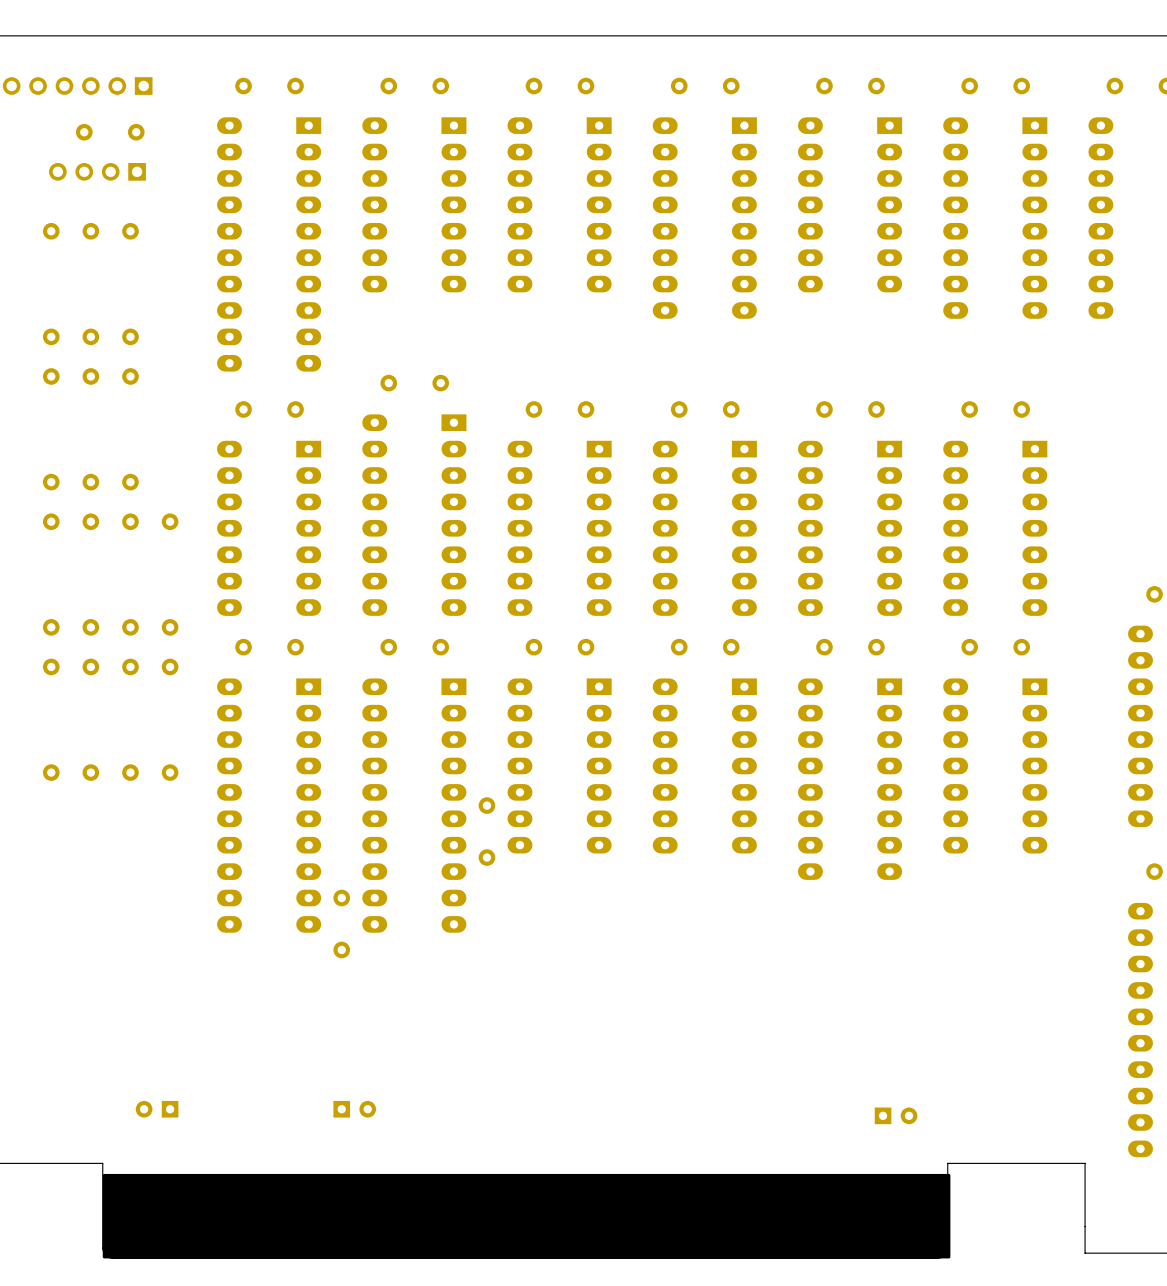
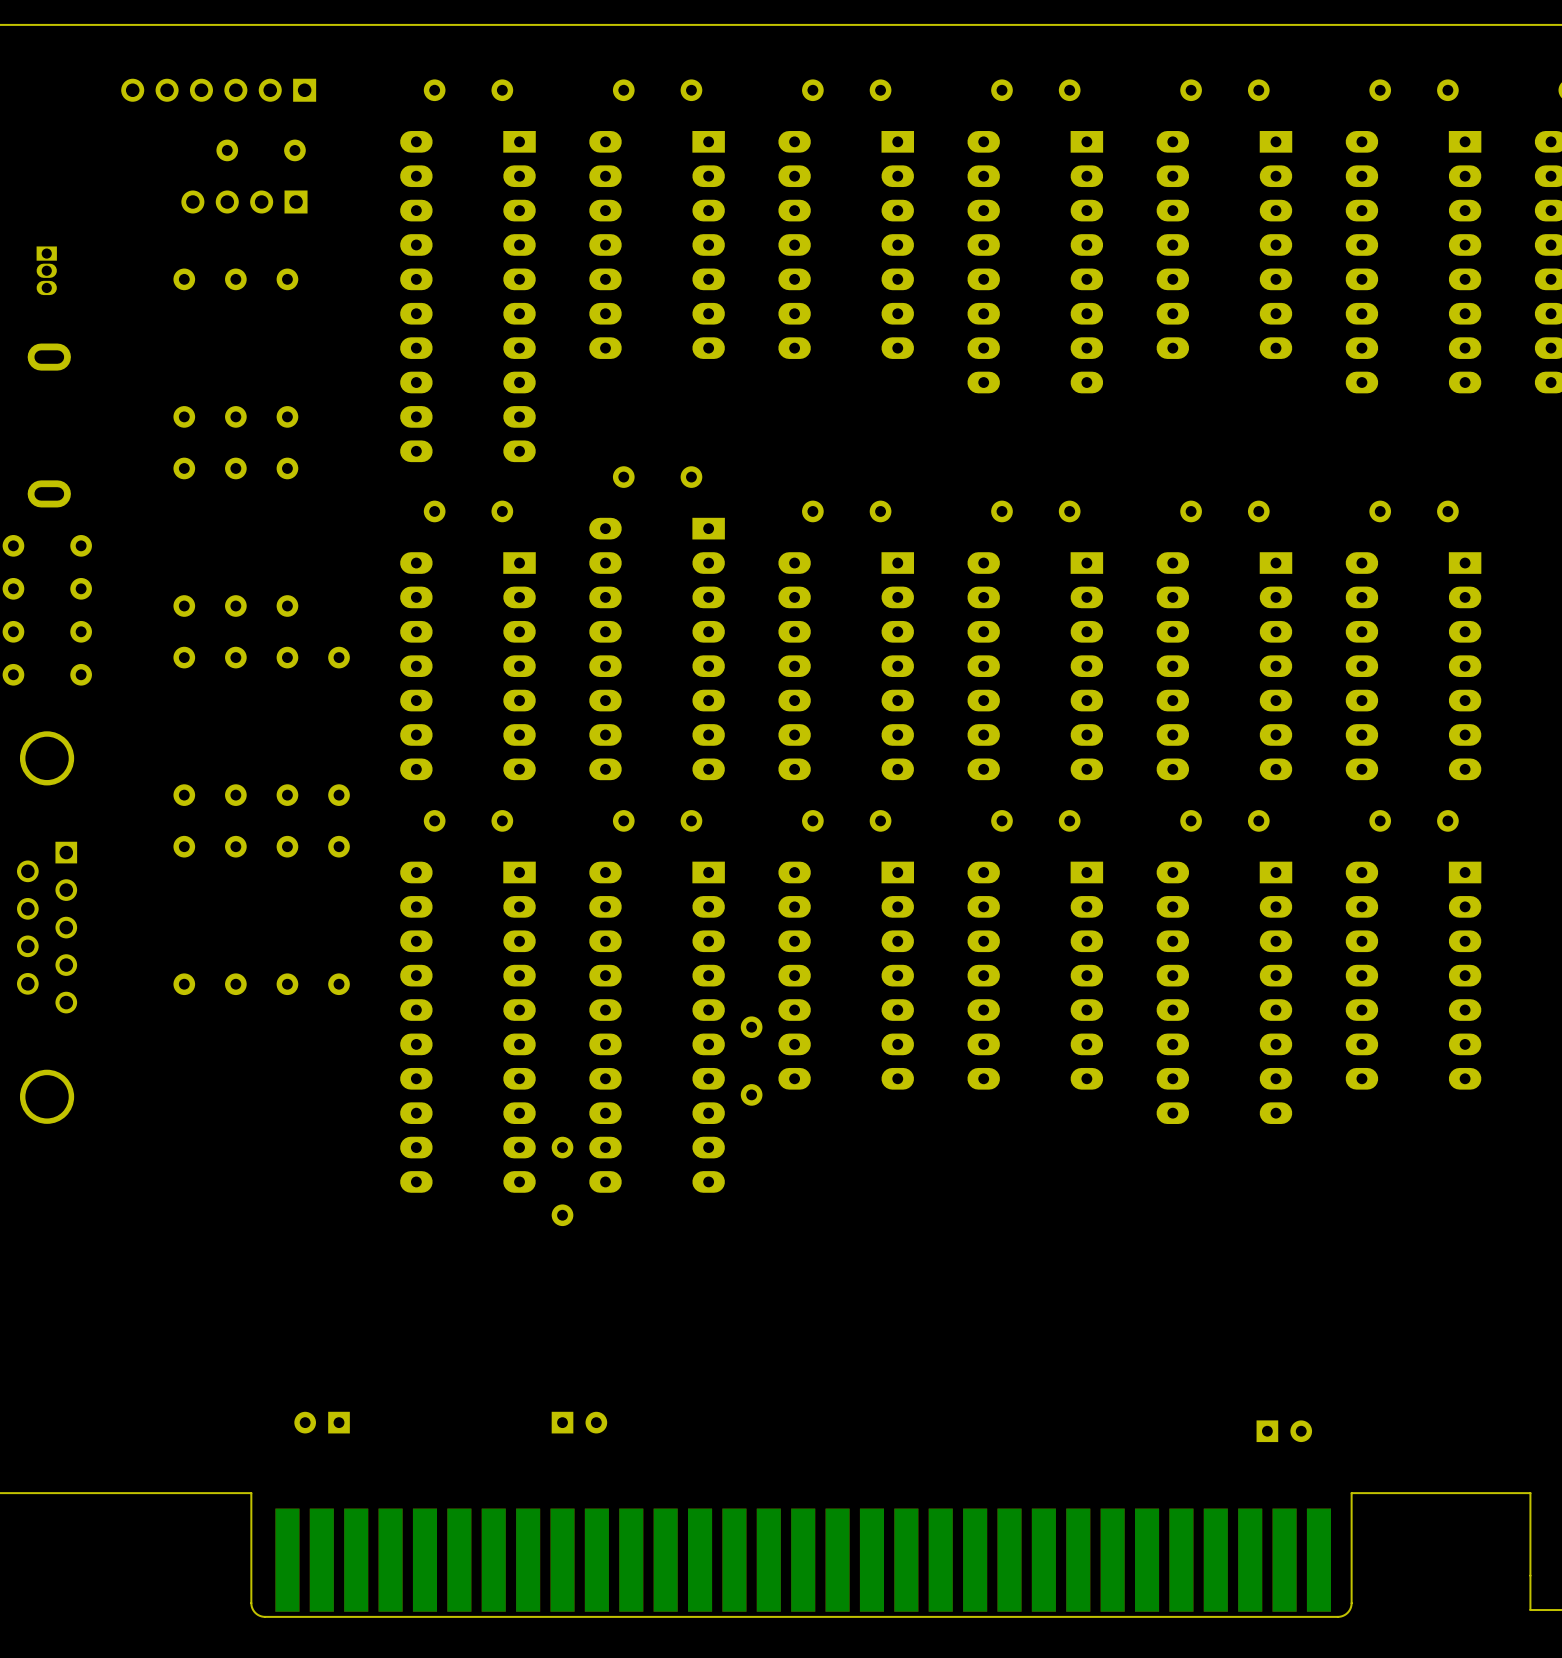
drawing: [102, 1173, 951, 1259] -> none

